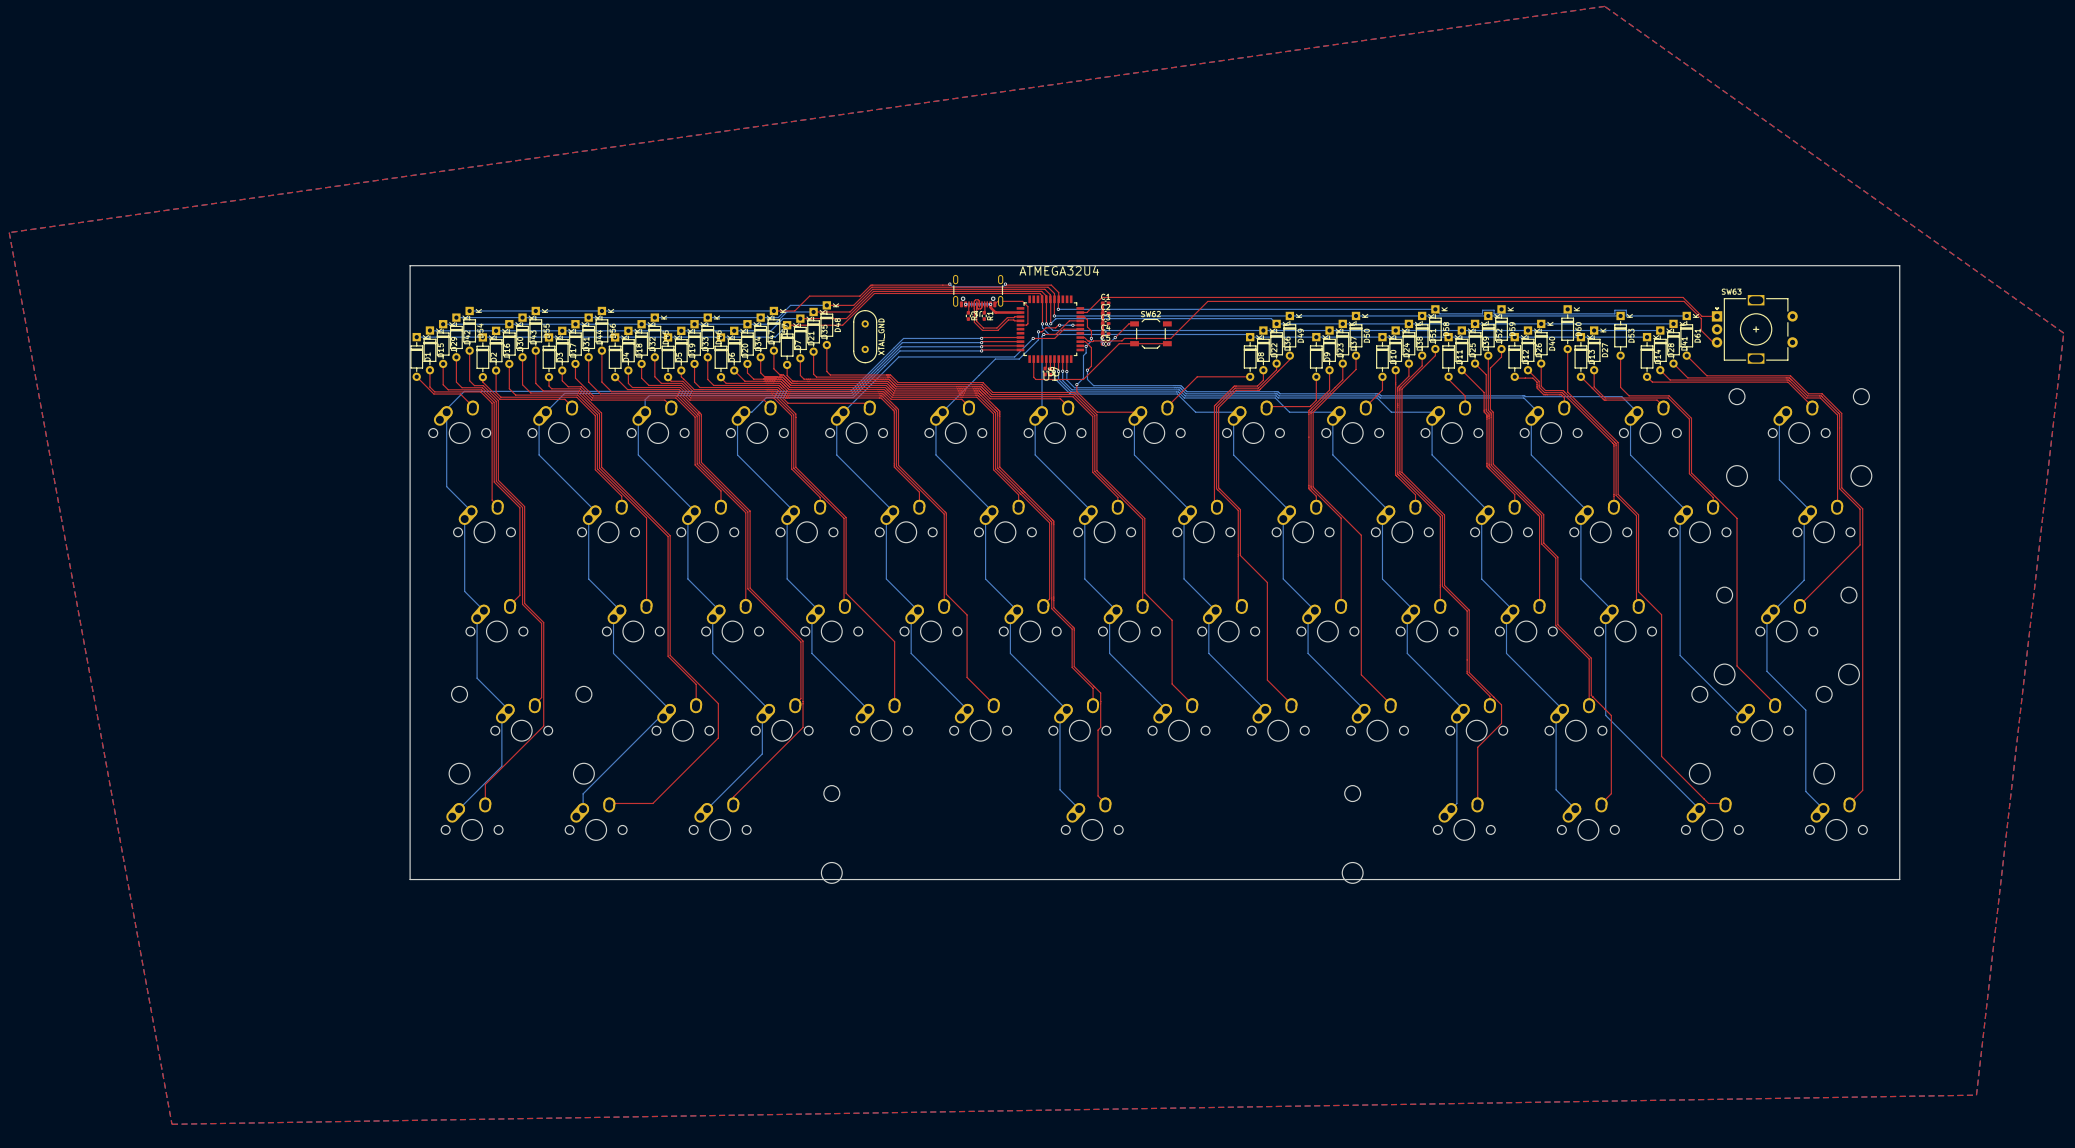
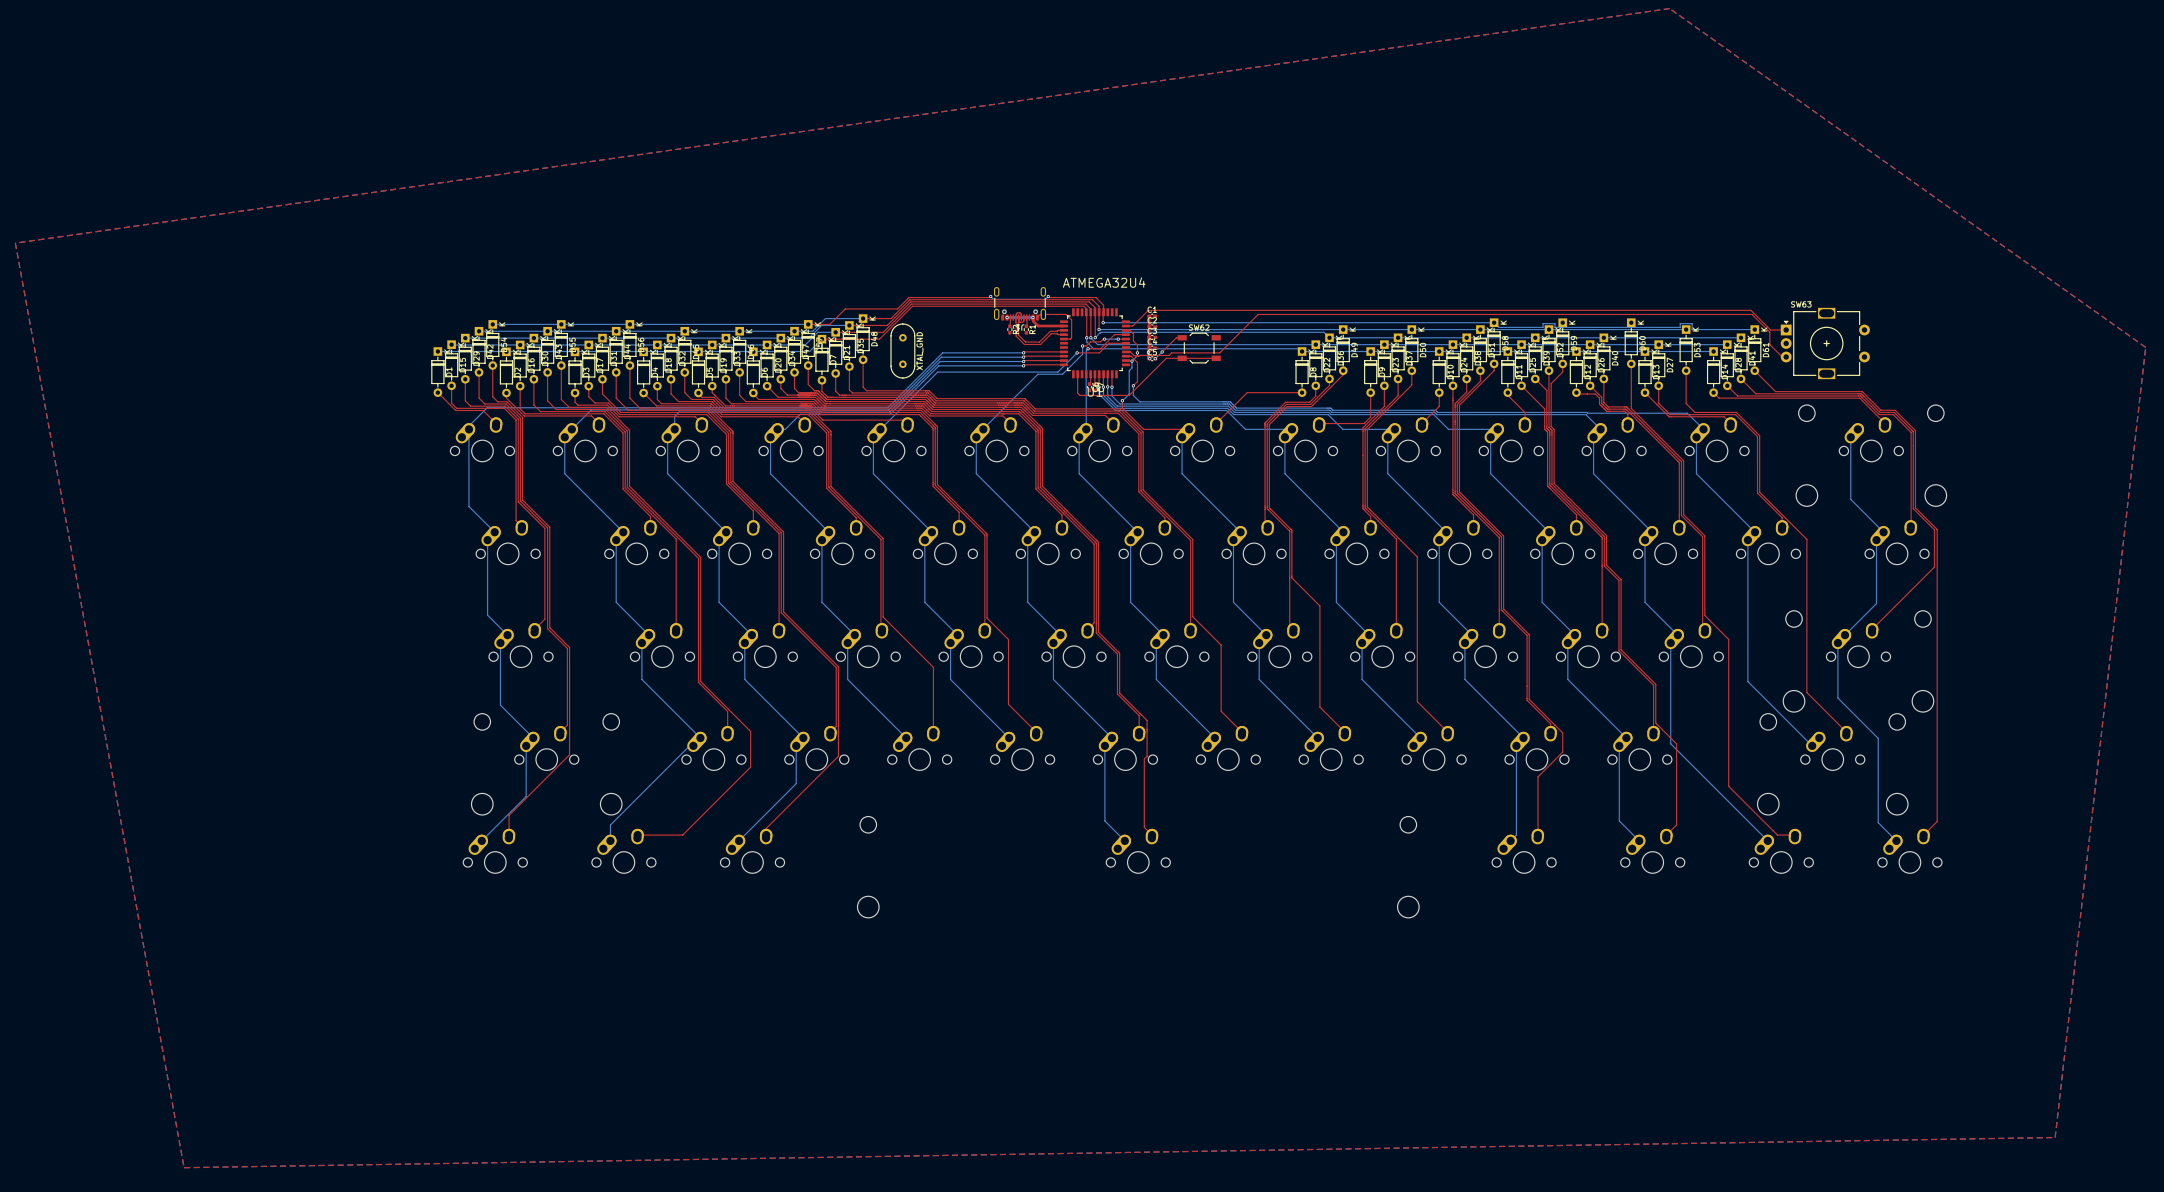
board edge: (410, 265) (1899, 265) (1899, 879) (410, 879) (410, 265) -> none

